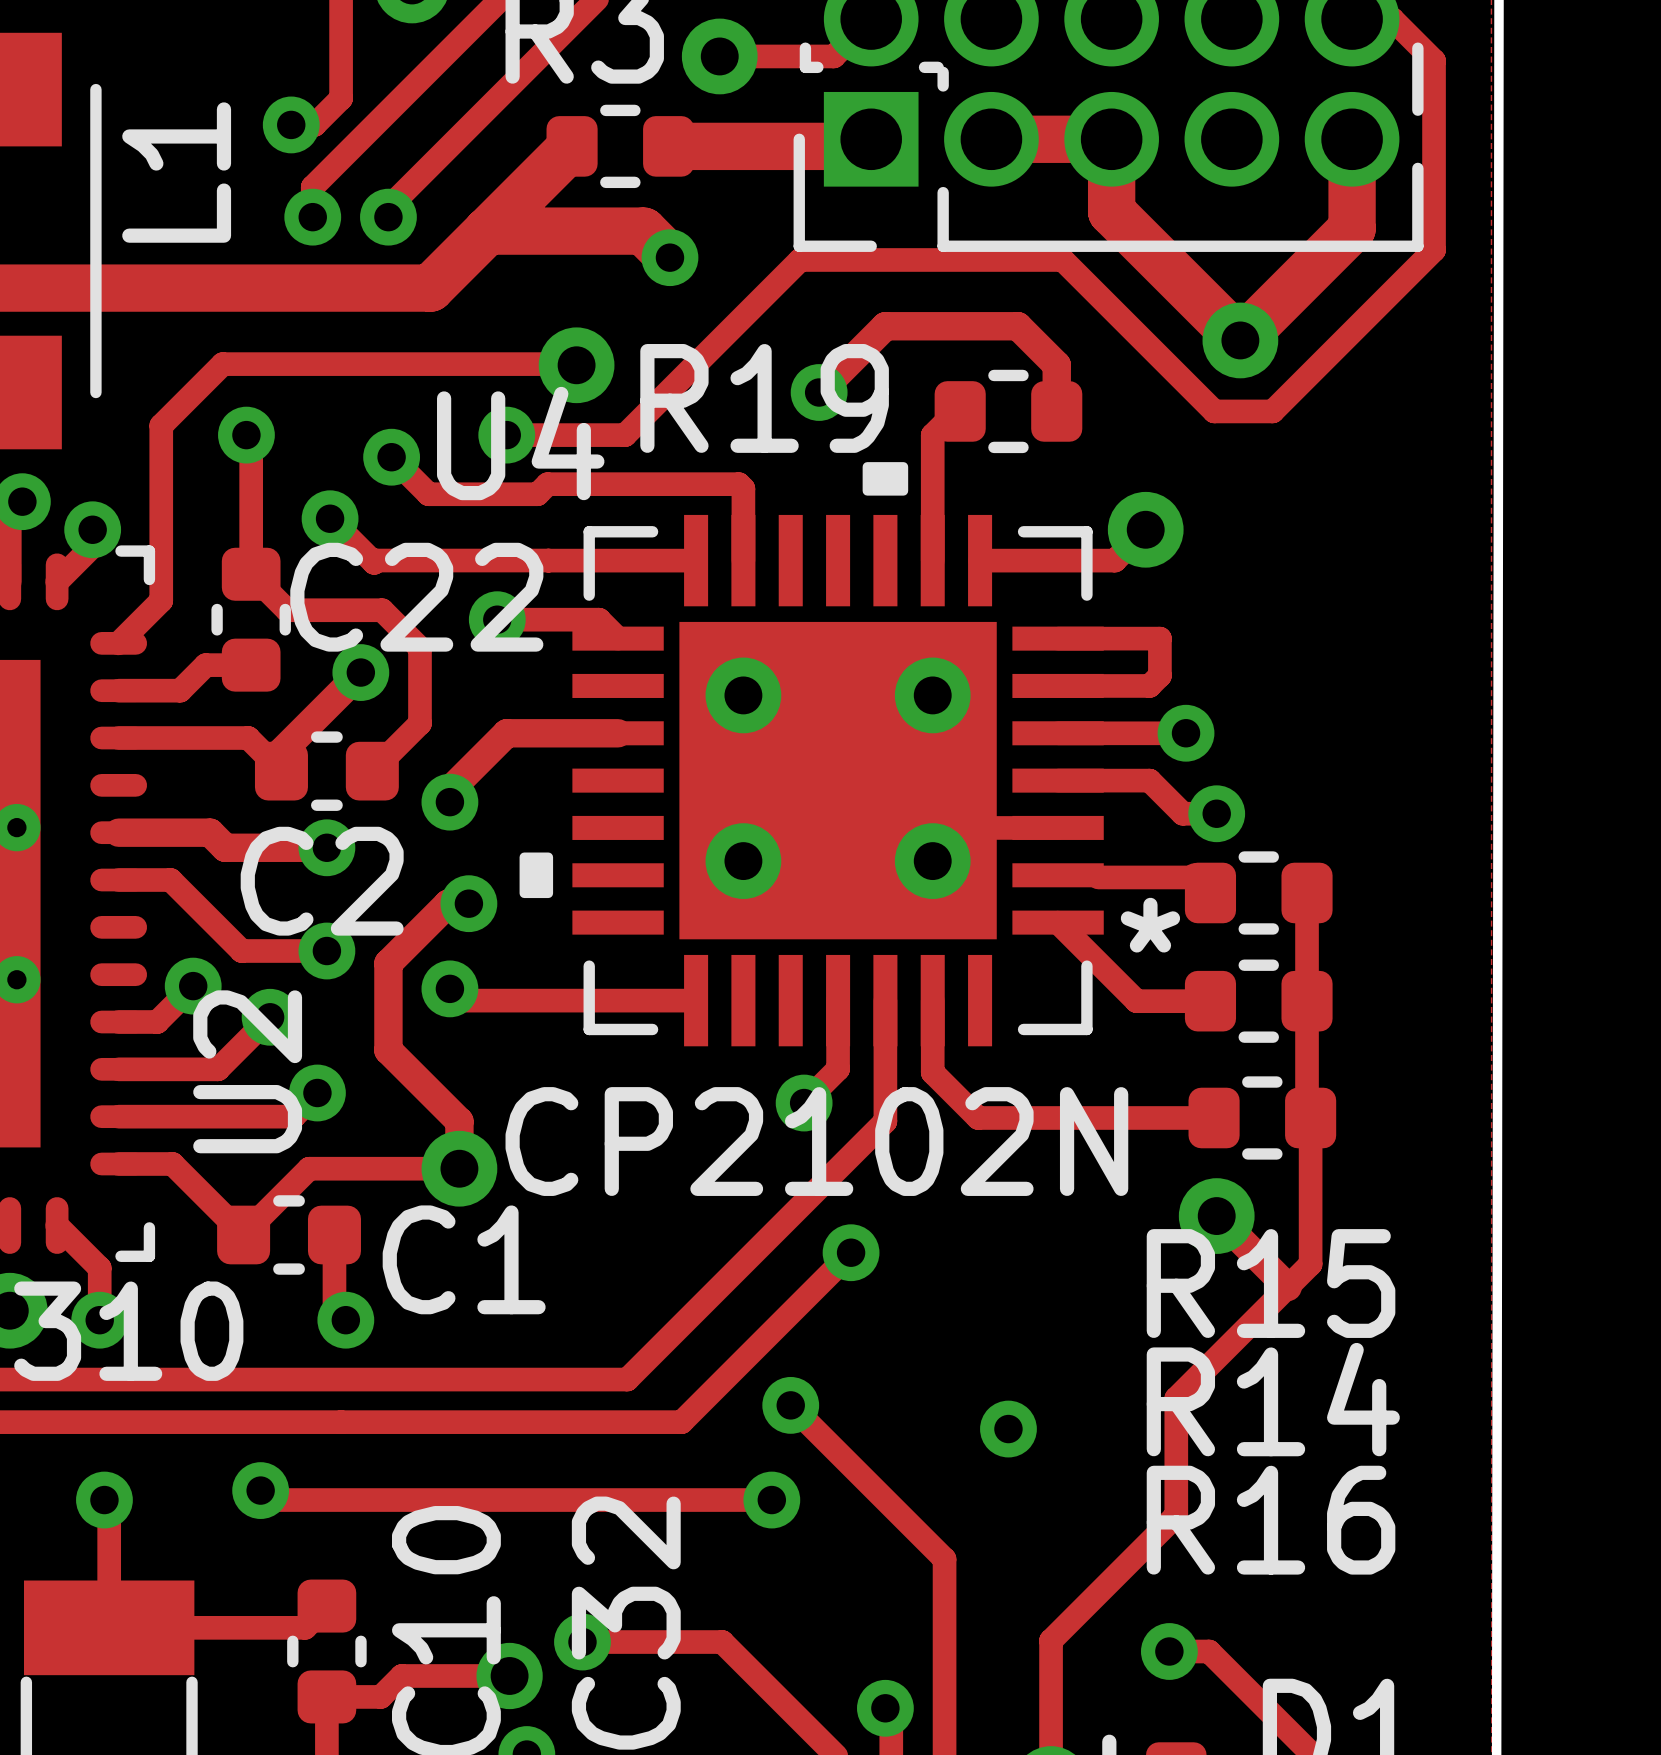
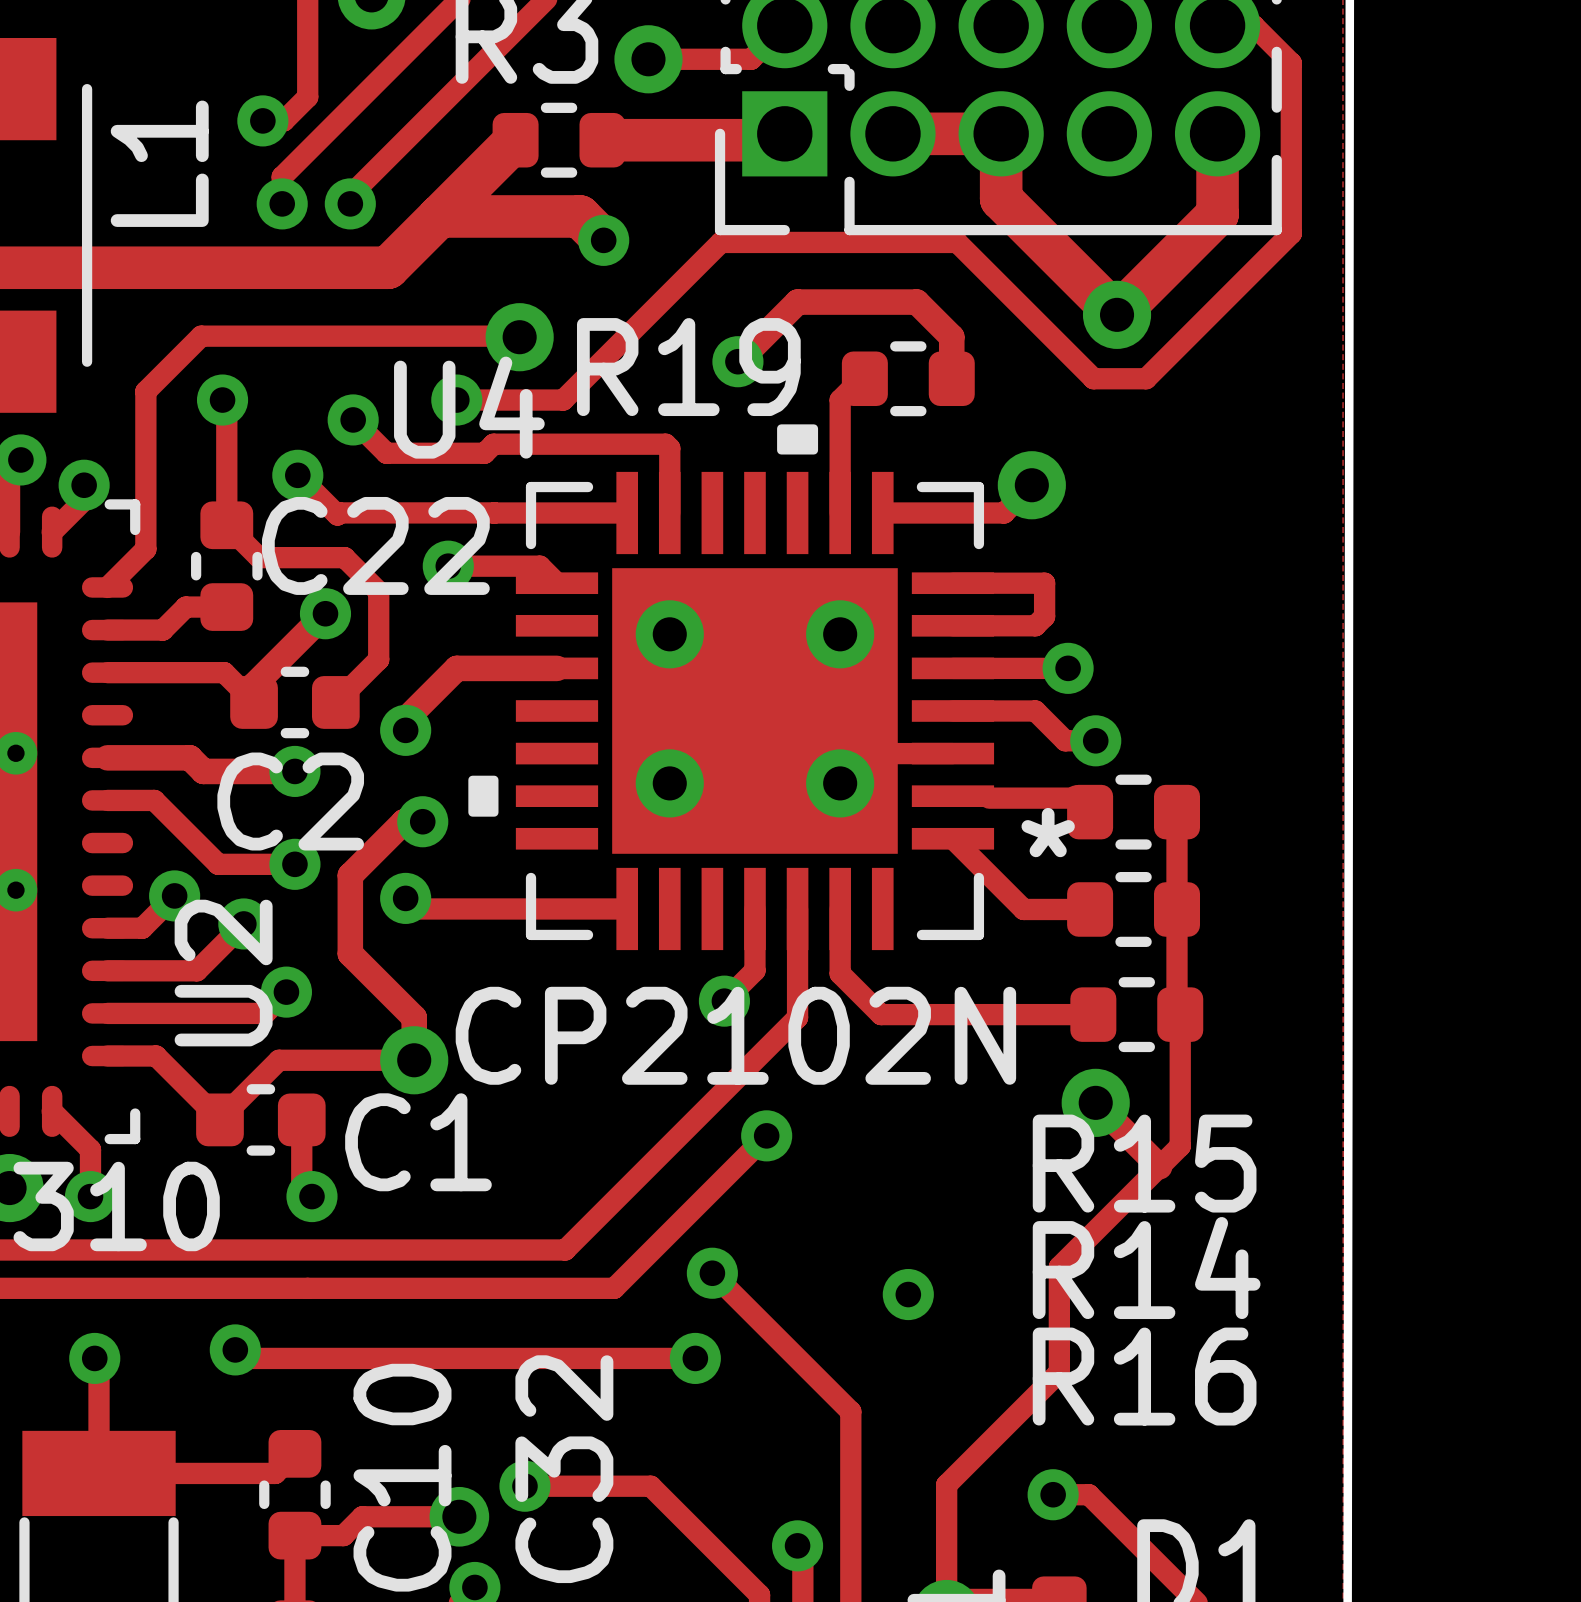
U4 text position: * (1150, 925) -> * (1048, 832)

